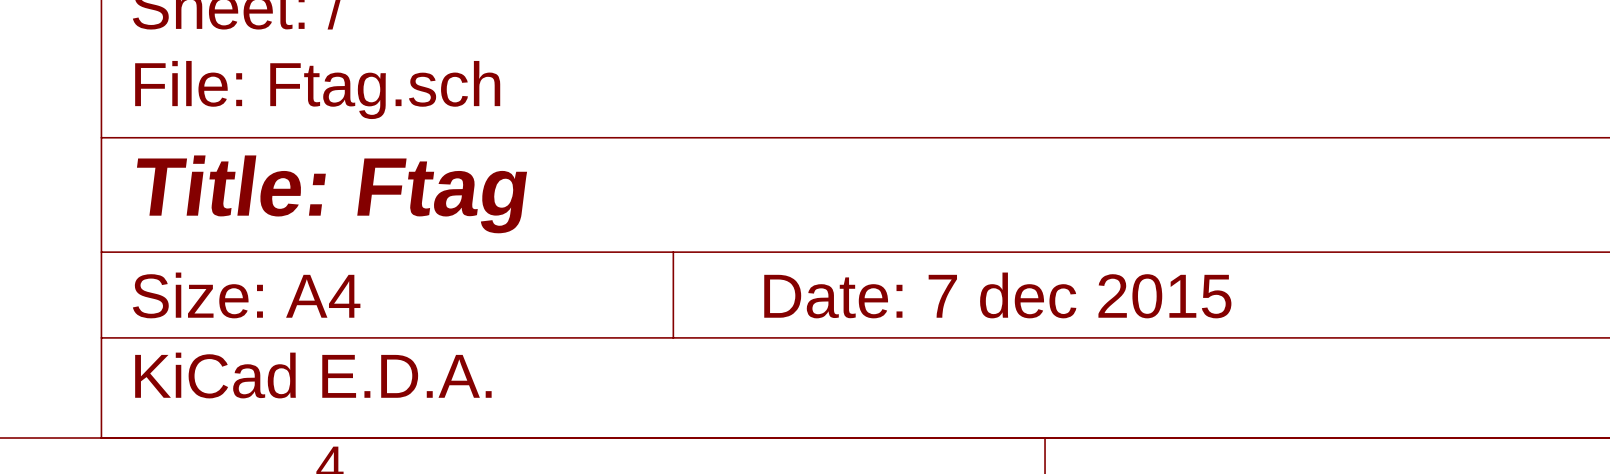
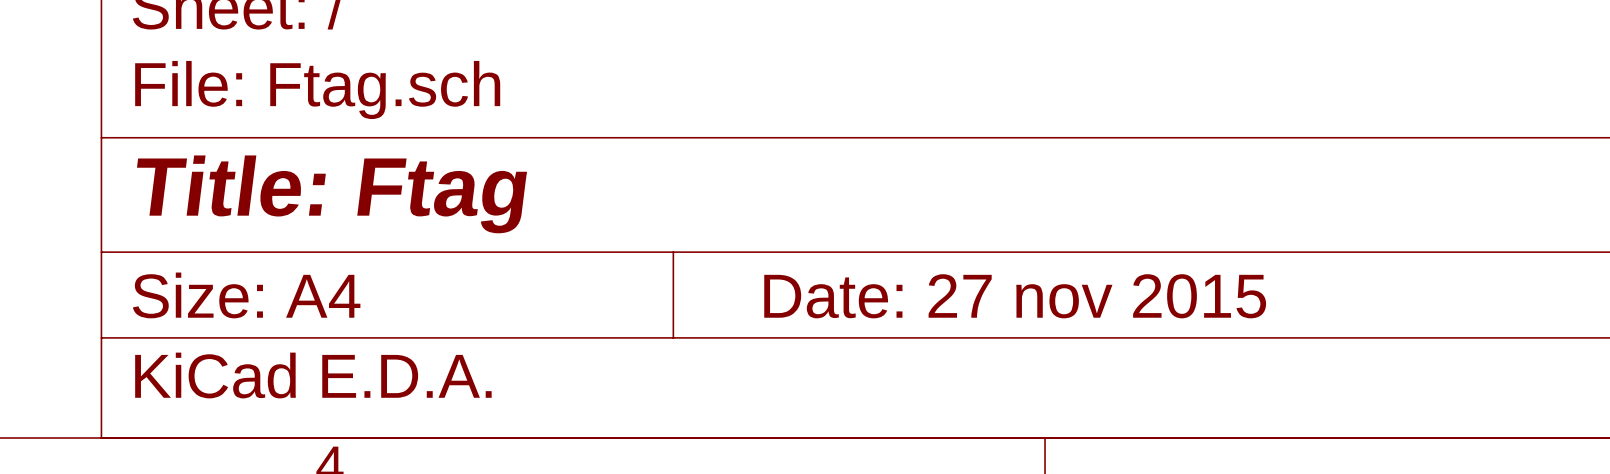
title block: Date: 7 dec 2015 (997, 295) -> Date: 27 nov 2015 (1015, 296)

